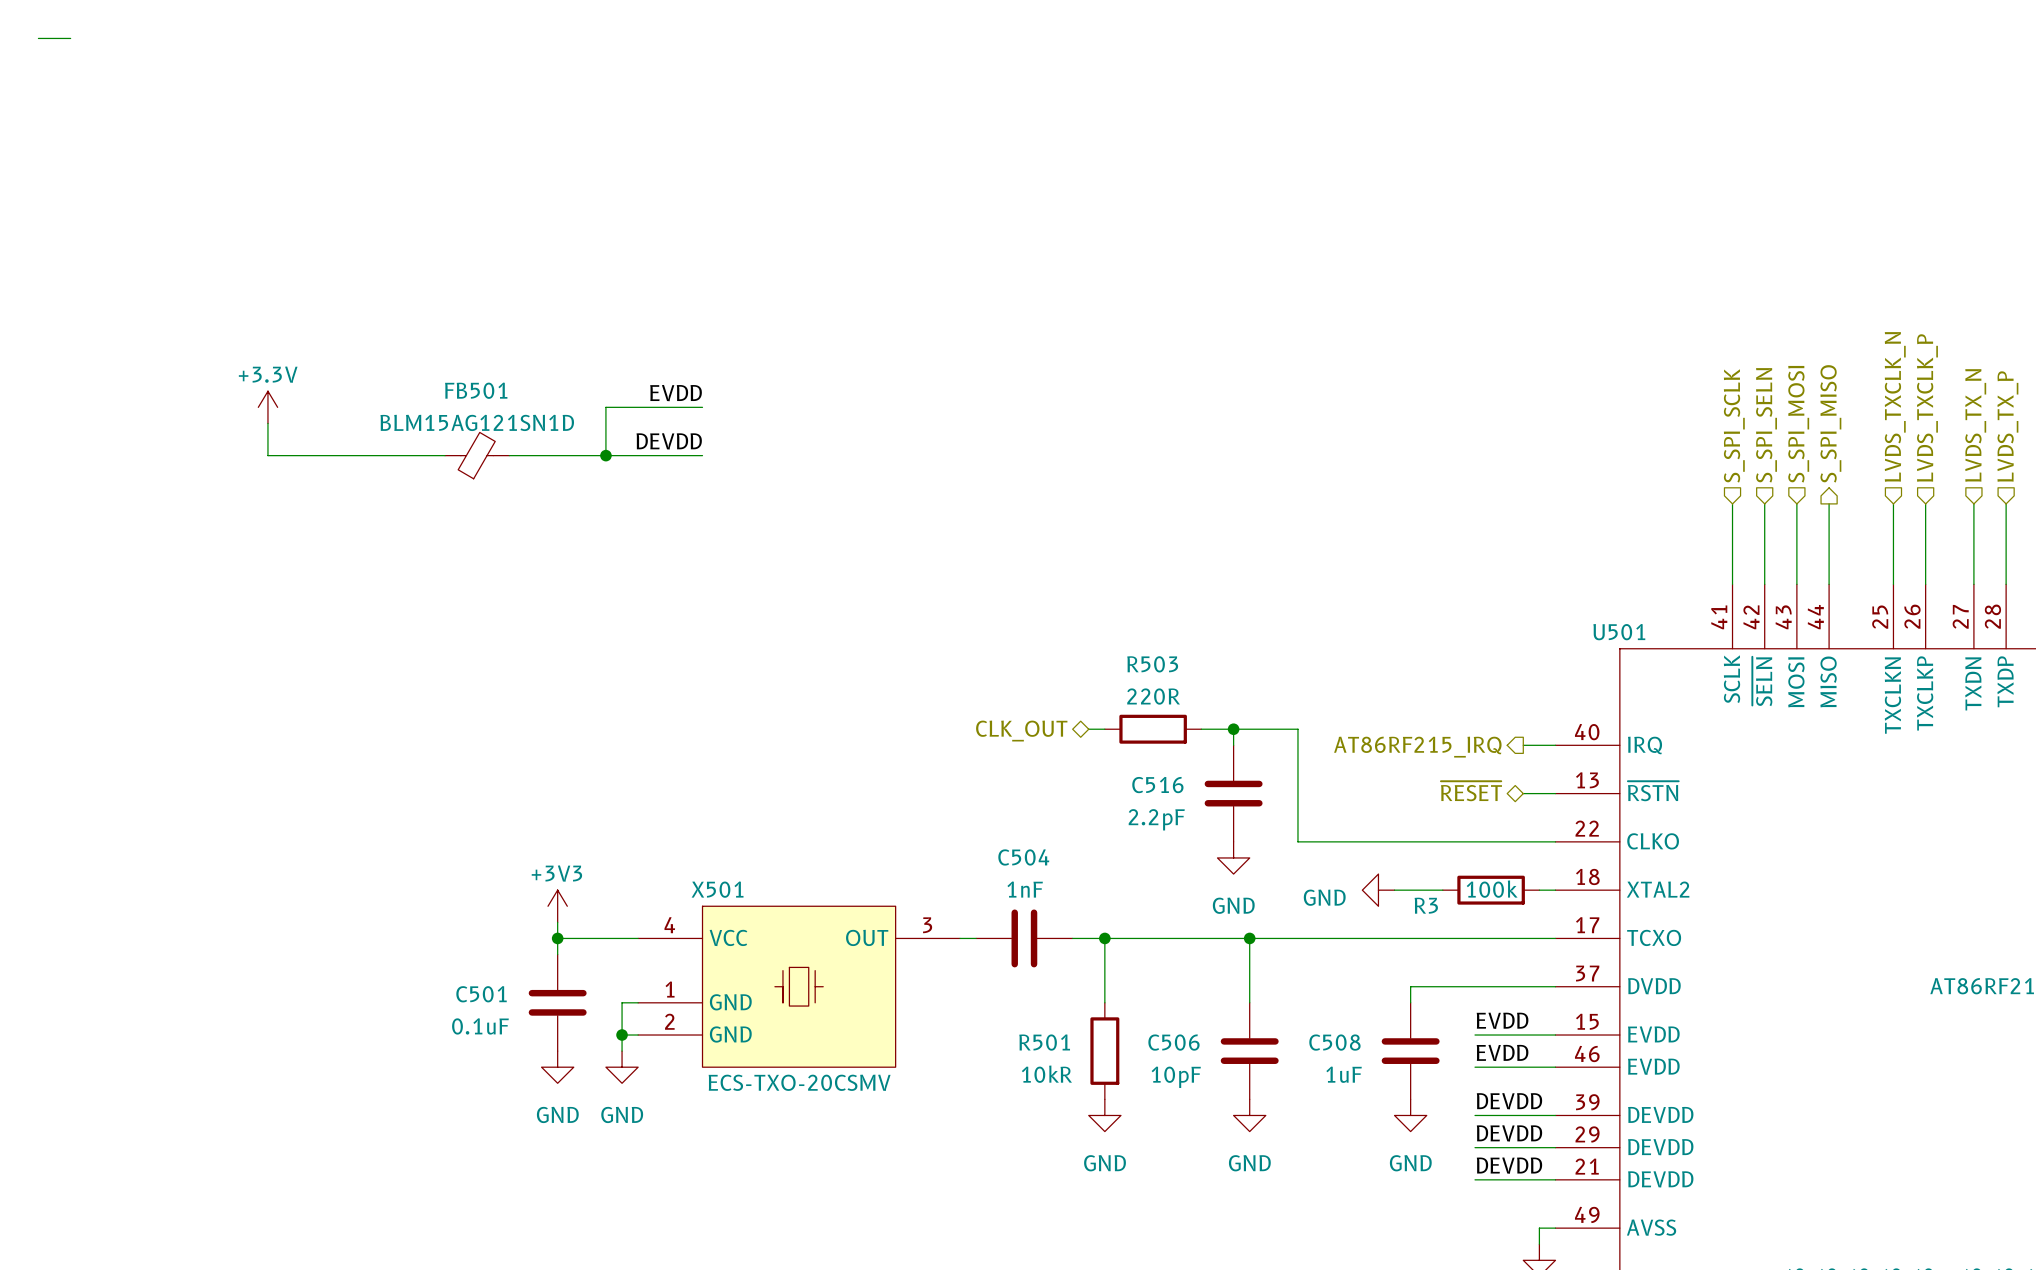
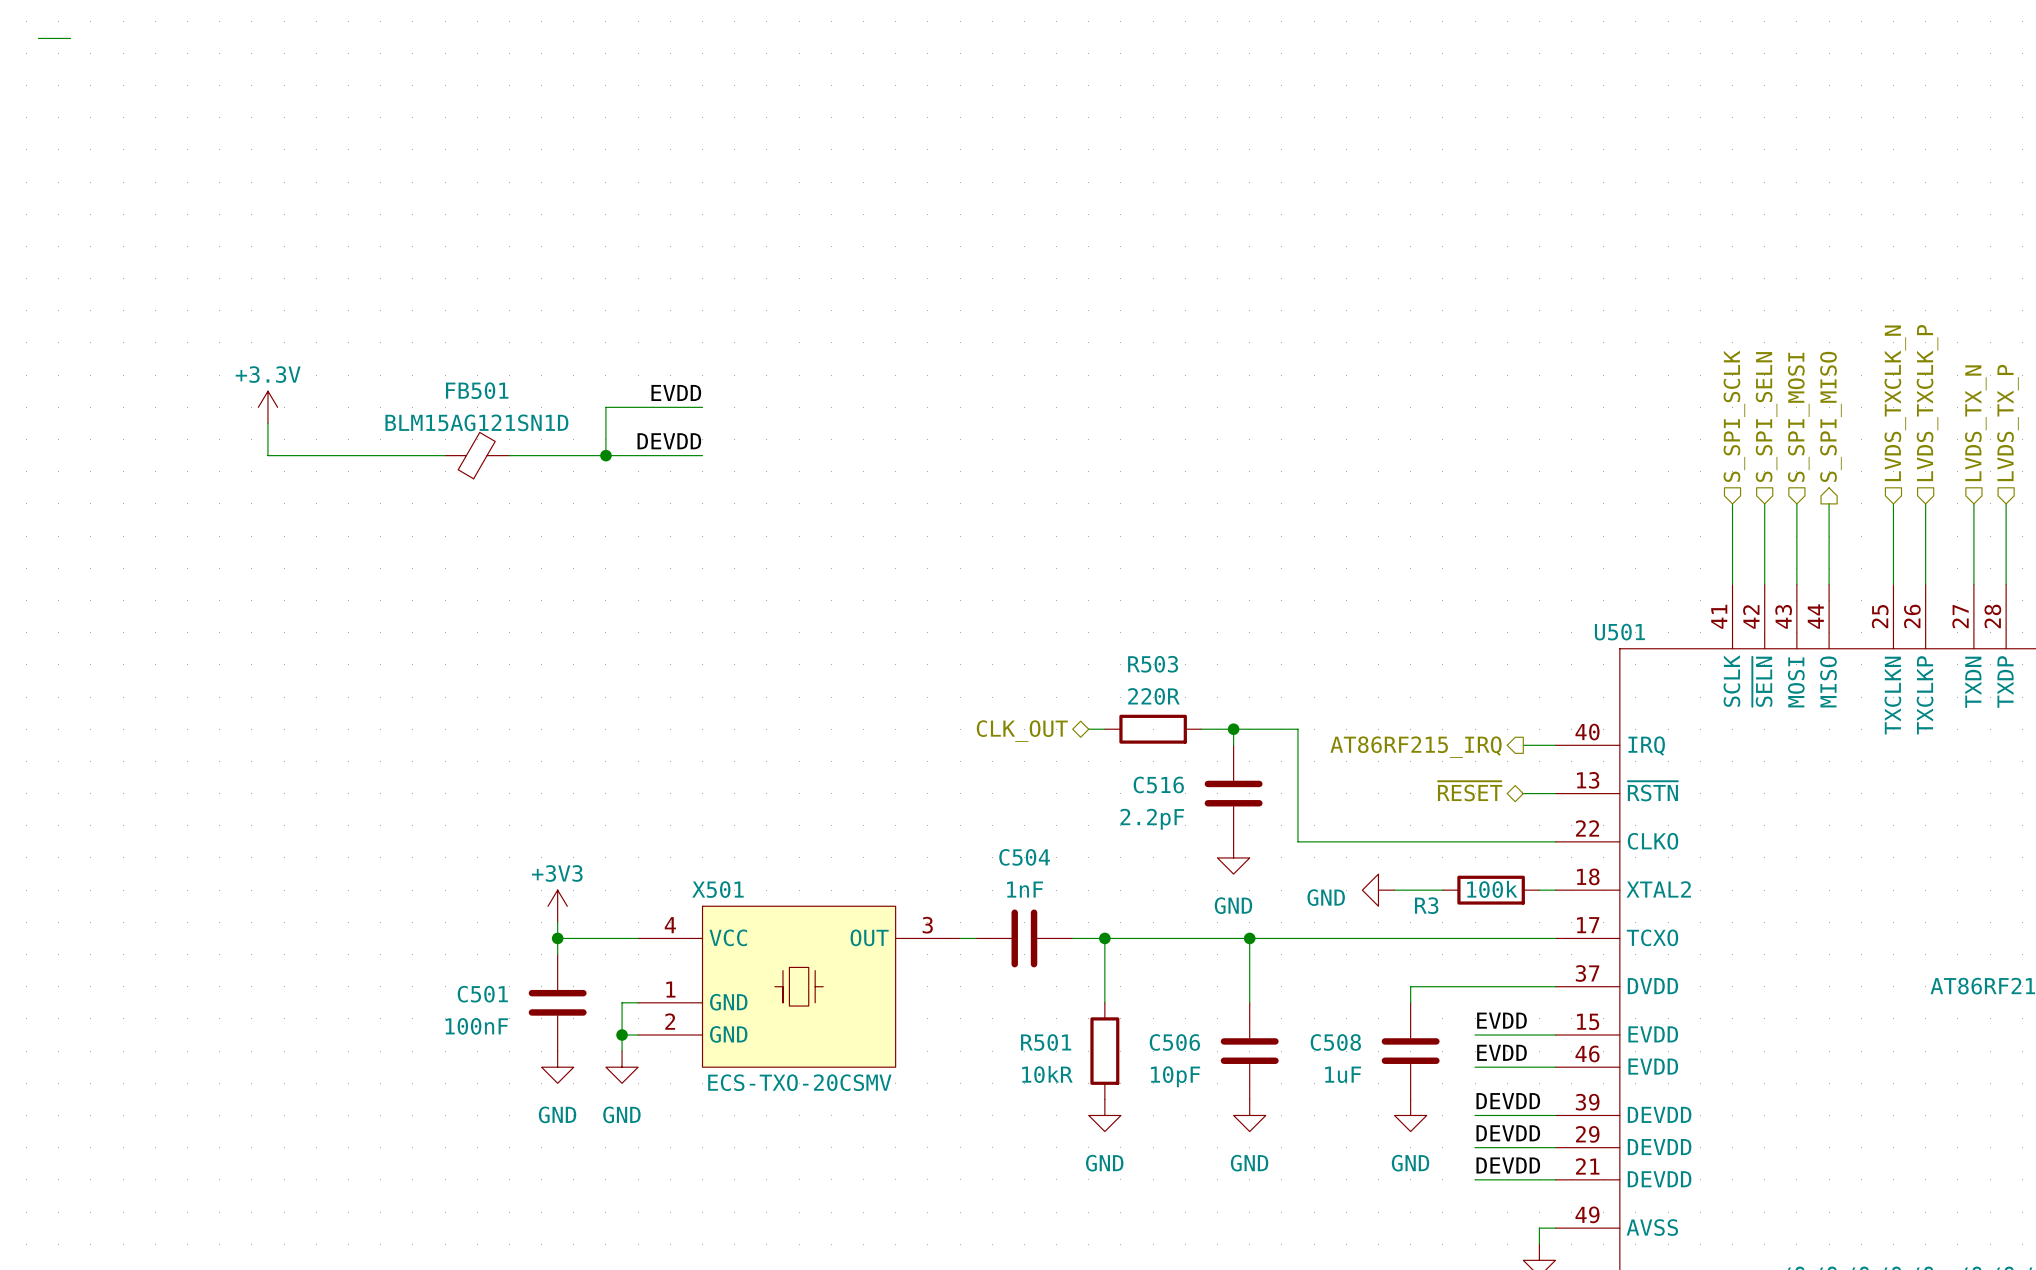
C501 value: 0.1uF (480, 1026) -> 100nF (476, 1026)

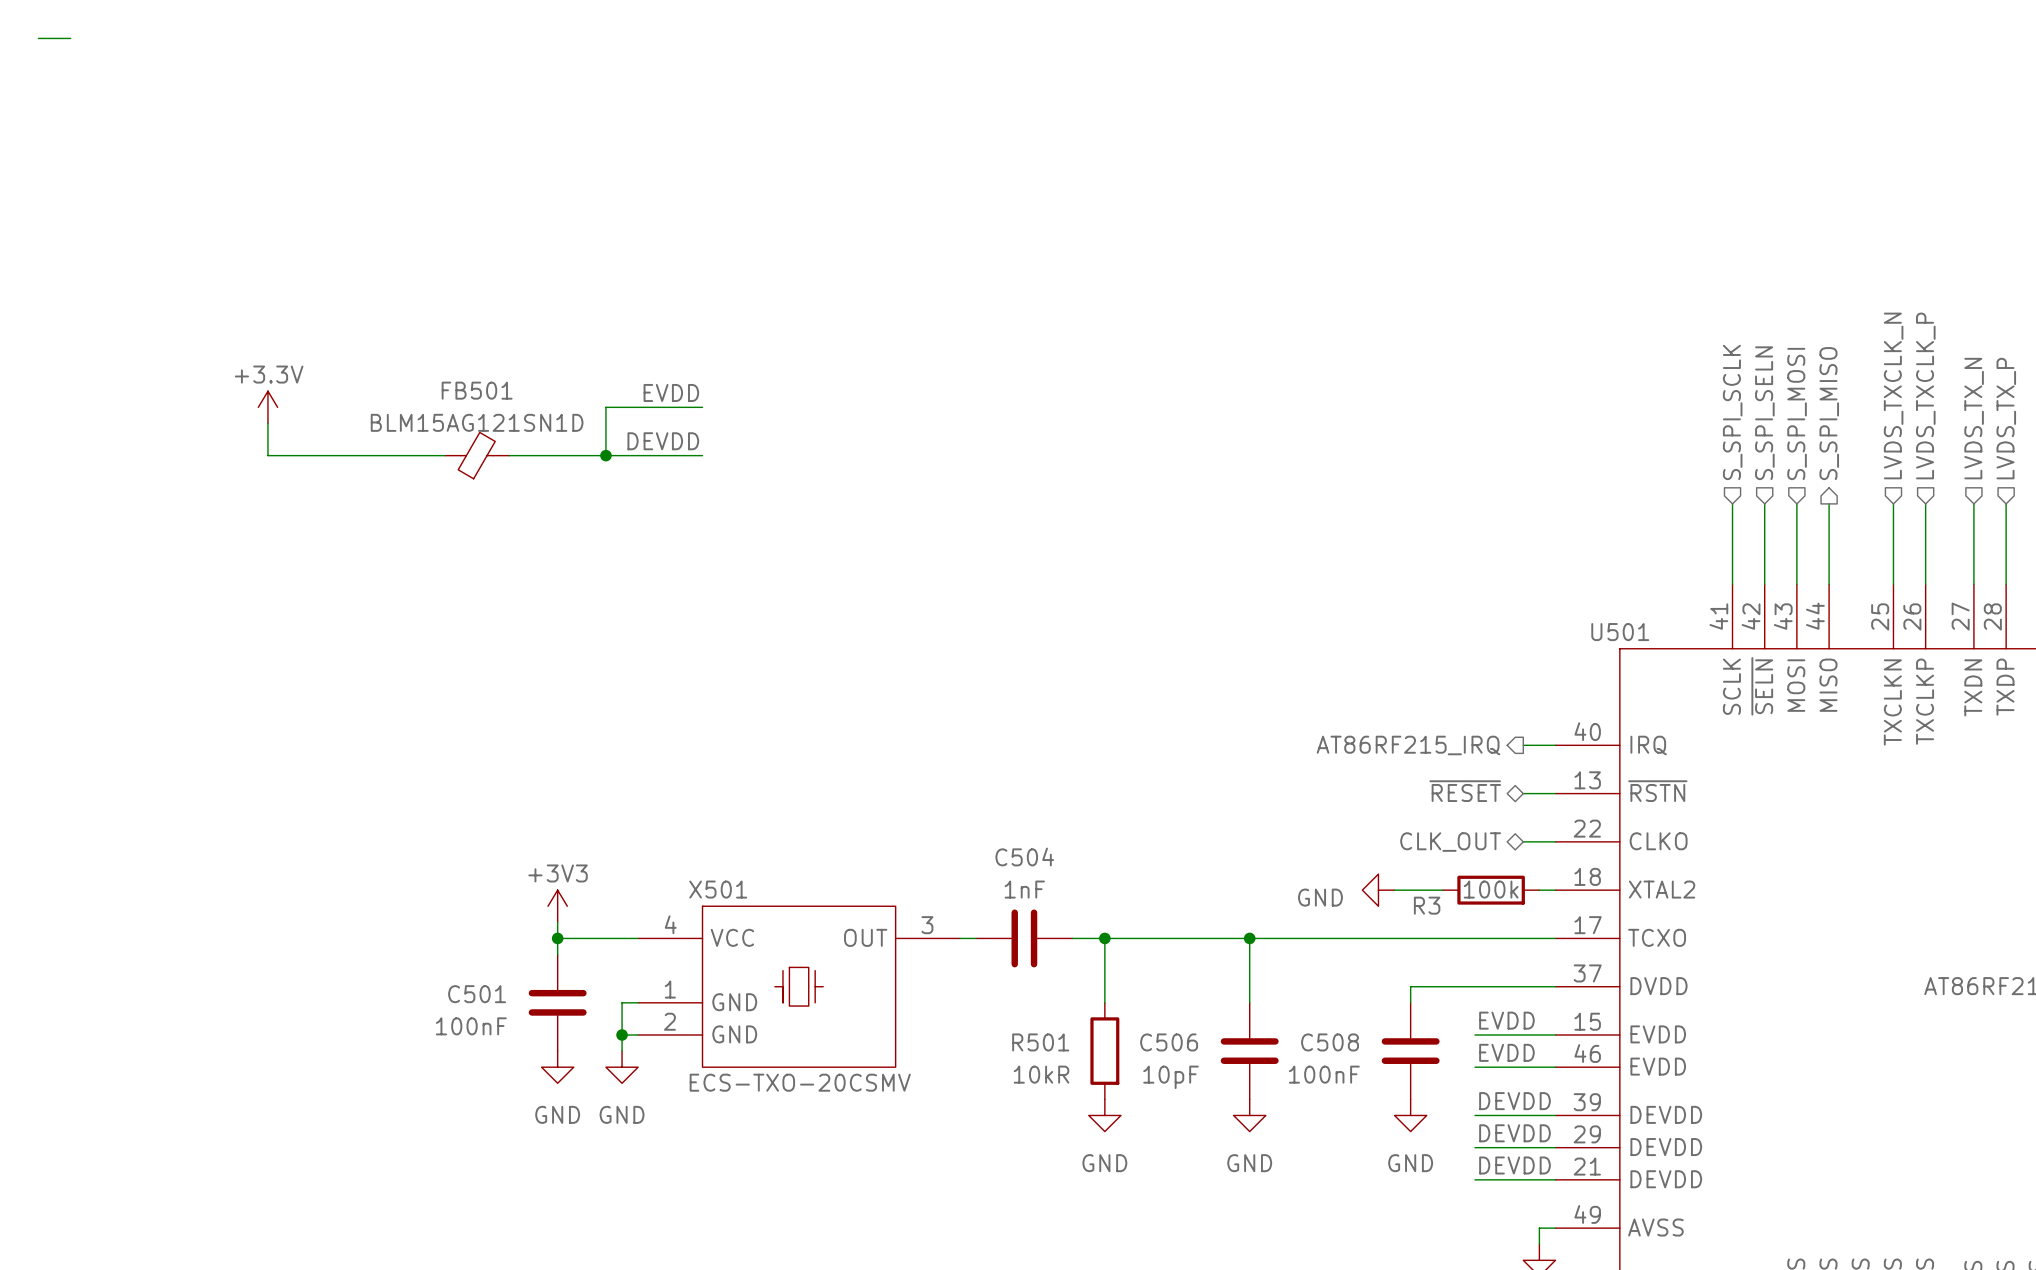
wire: (1088, 729) (1104, 729) -> none
R503: 220R (1153, 729) -> none
wire: (1201, 729) (1297, 729) (1297, 841) (1523, 841) -> none
wire: (1233, 729) (1233, 745) -> none
junction: (1233, 729) -> none
hierarchical label: CLK_OUT (1022, 731) -> none
C516: 2.2pF (1233, 793) -> none
hierarchical label: none -> CLK_OUT (1450, 842)
power symbol: GND (1233, 857) -> none
C508 value: 1uF (1343, 1074) -> 100nF (1324, 1074)

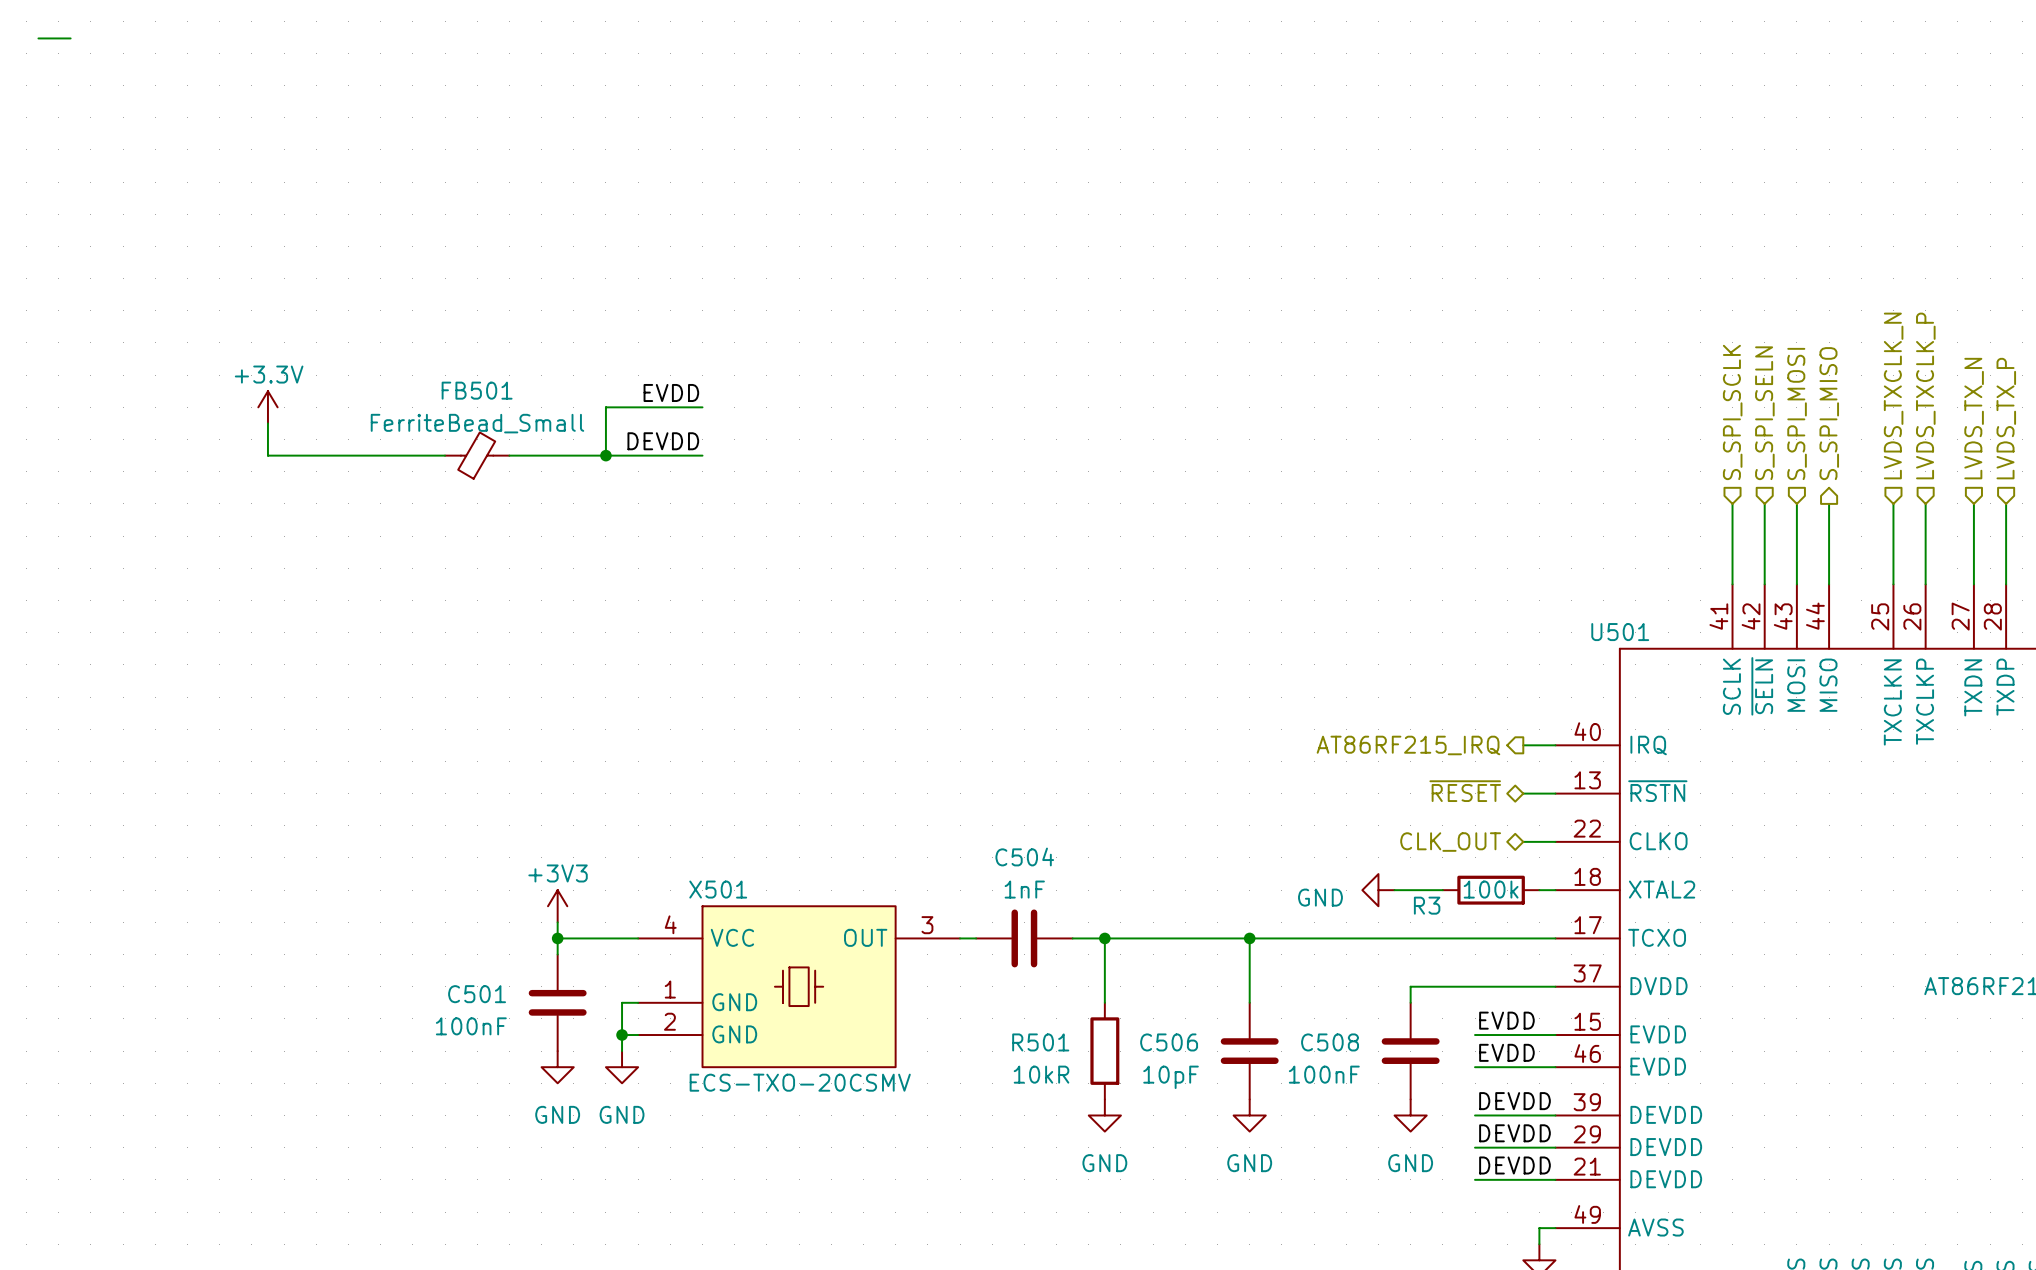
FB501 value: BLM15AG121SN1D (477, 422) -> FerriteBead_Small (477, 423)

